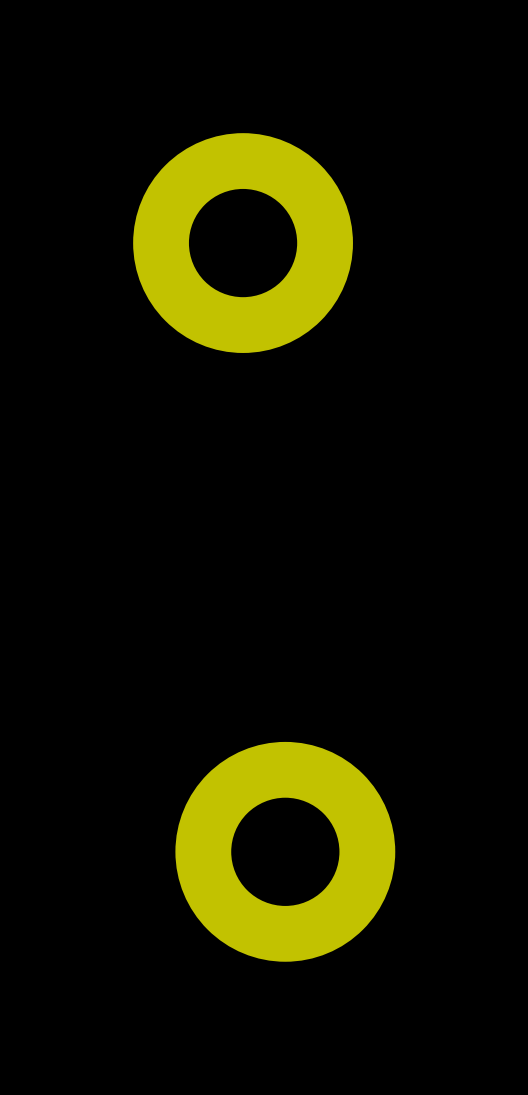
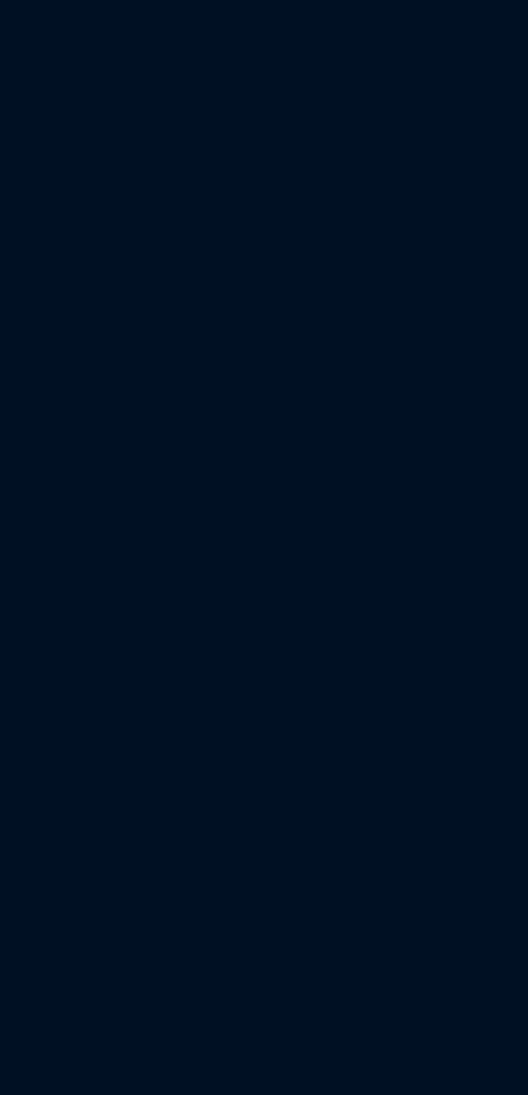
part: (243, 243) -> none
part: (285, 851) -> none

